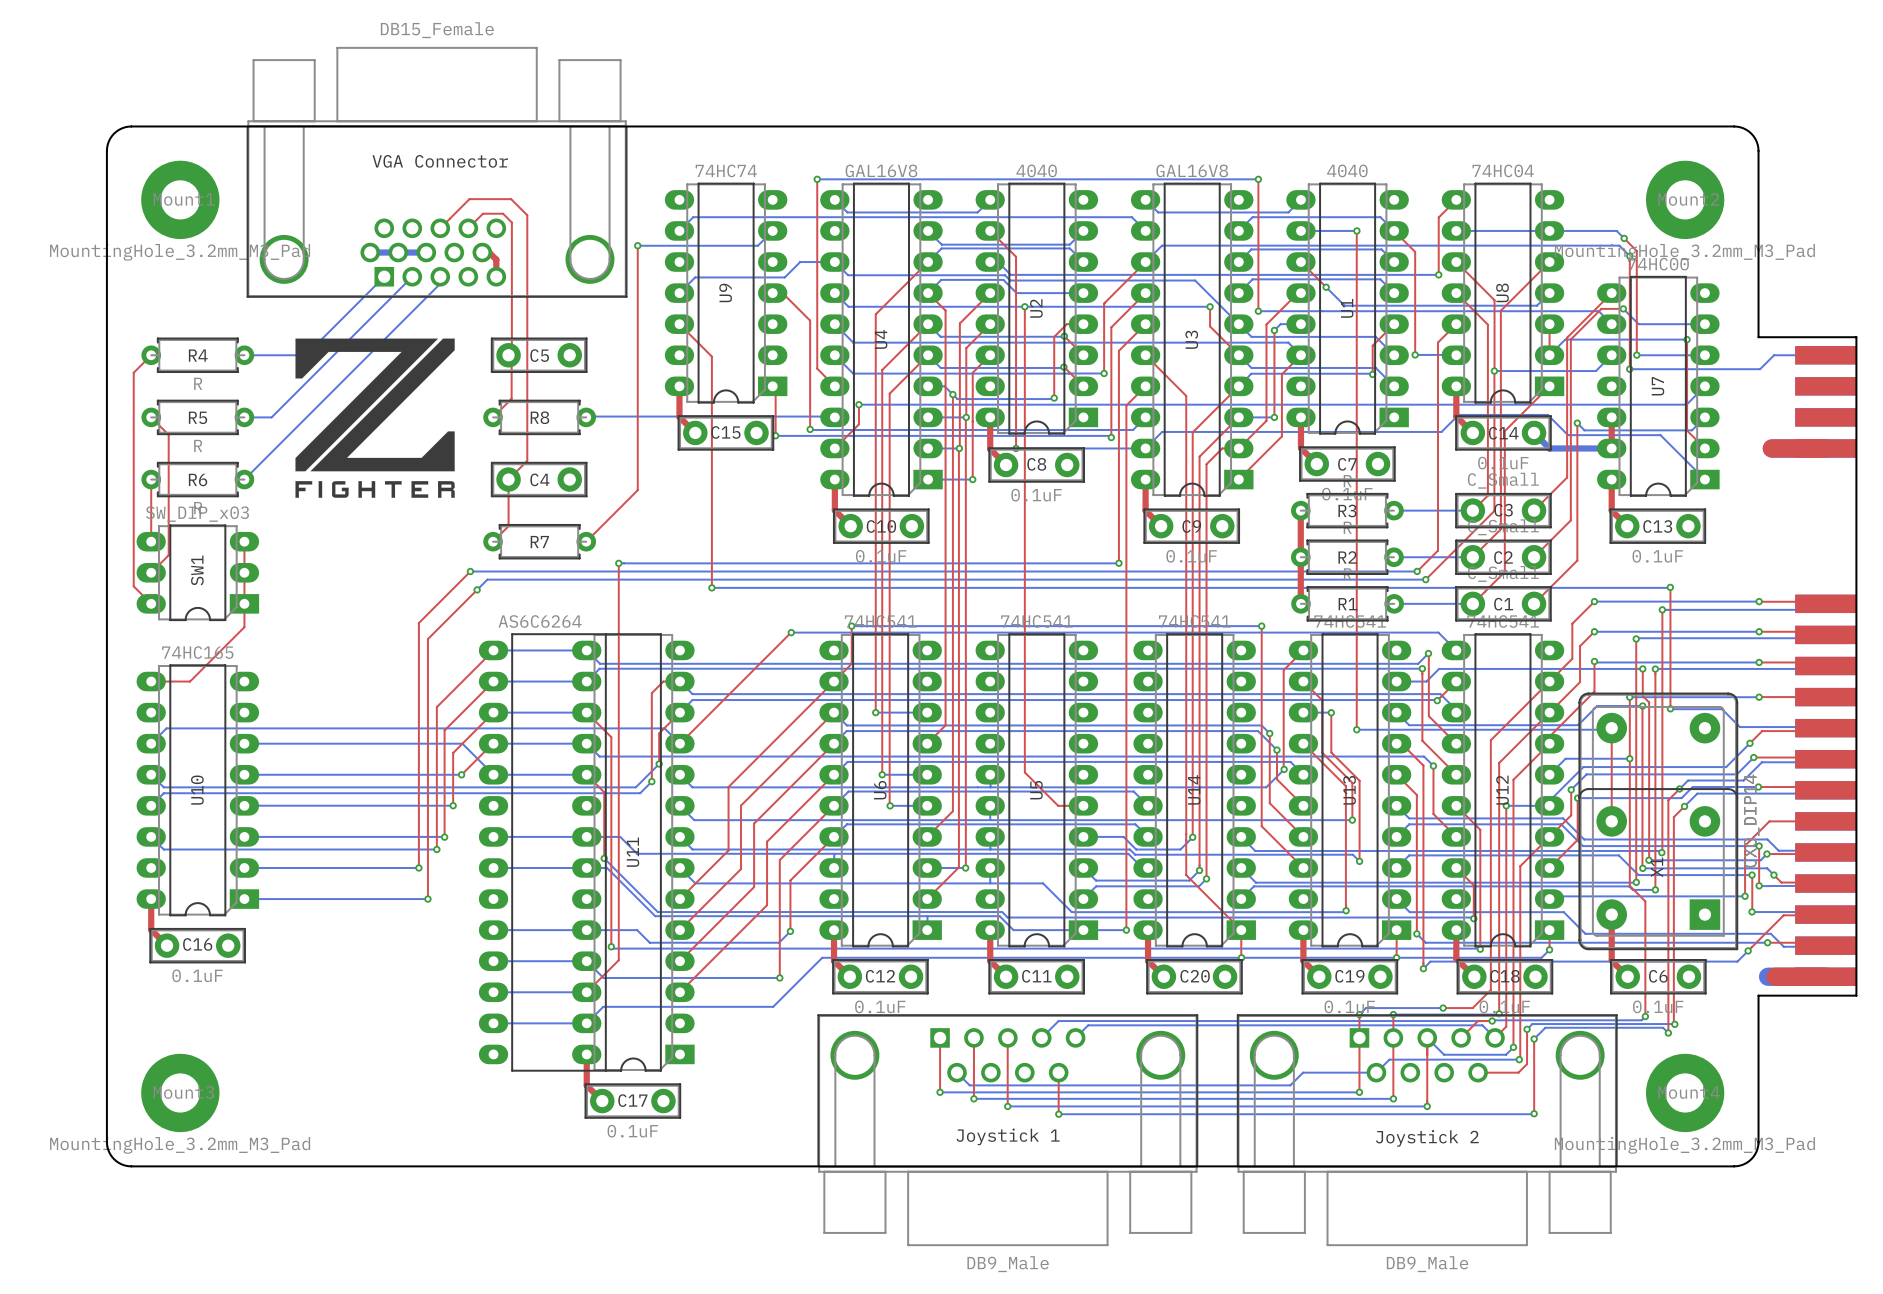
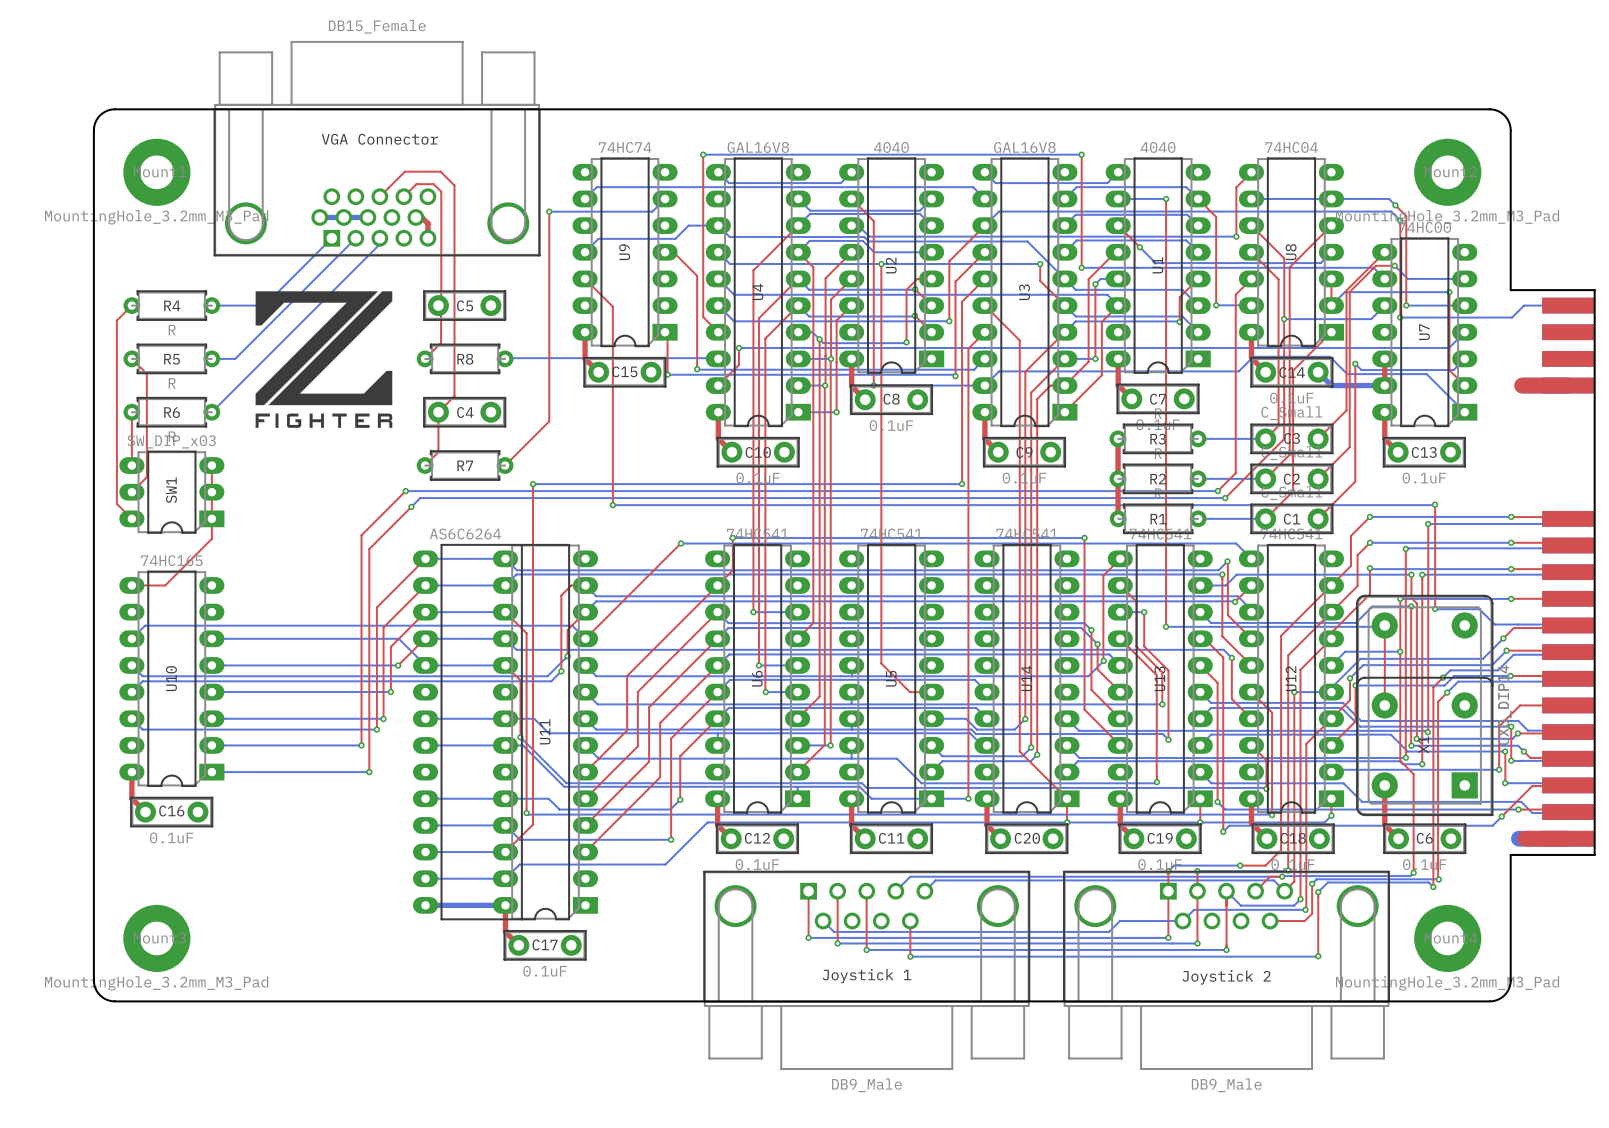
bottom track: none -> (425, 905) (505, 905)

